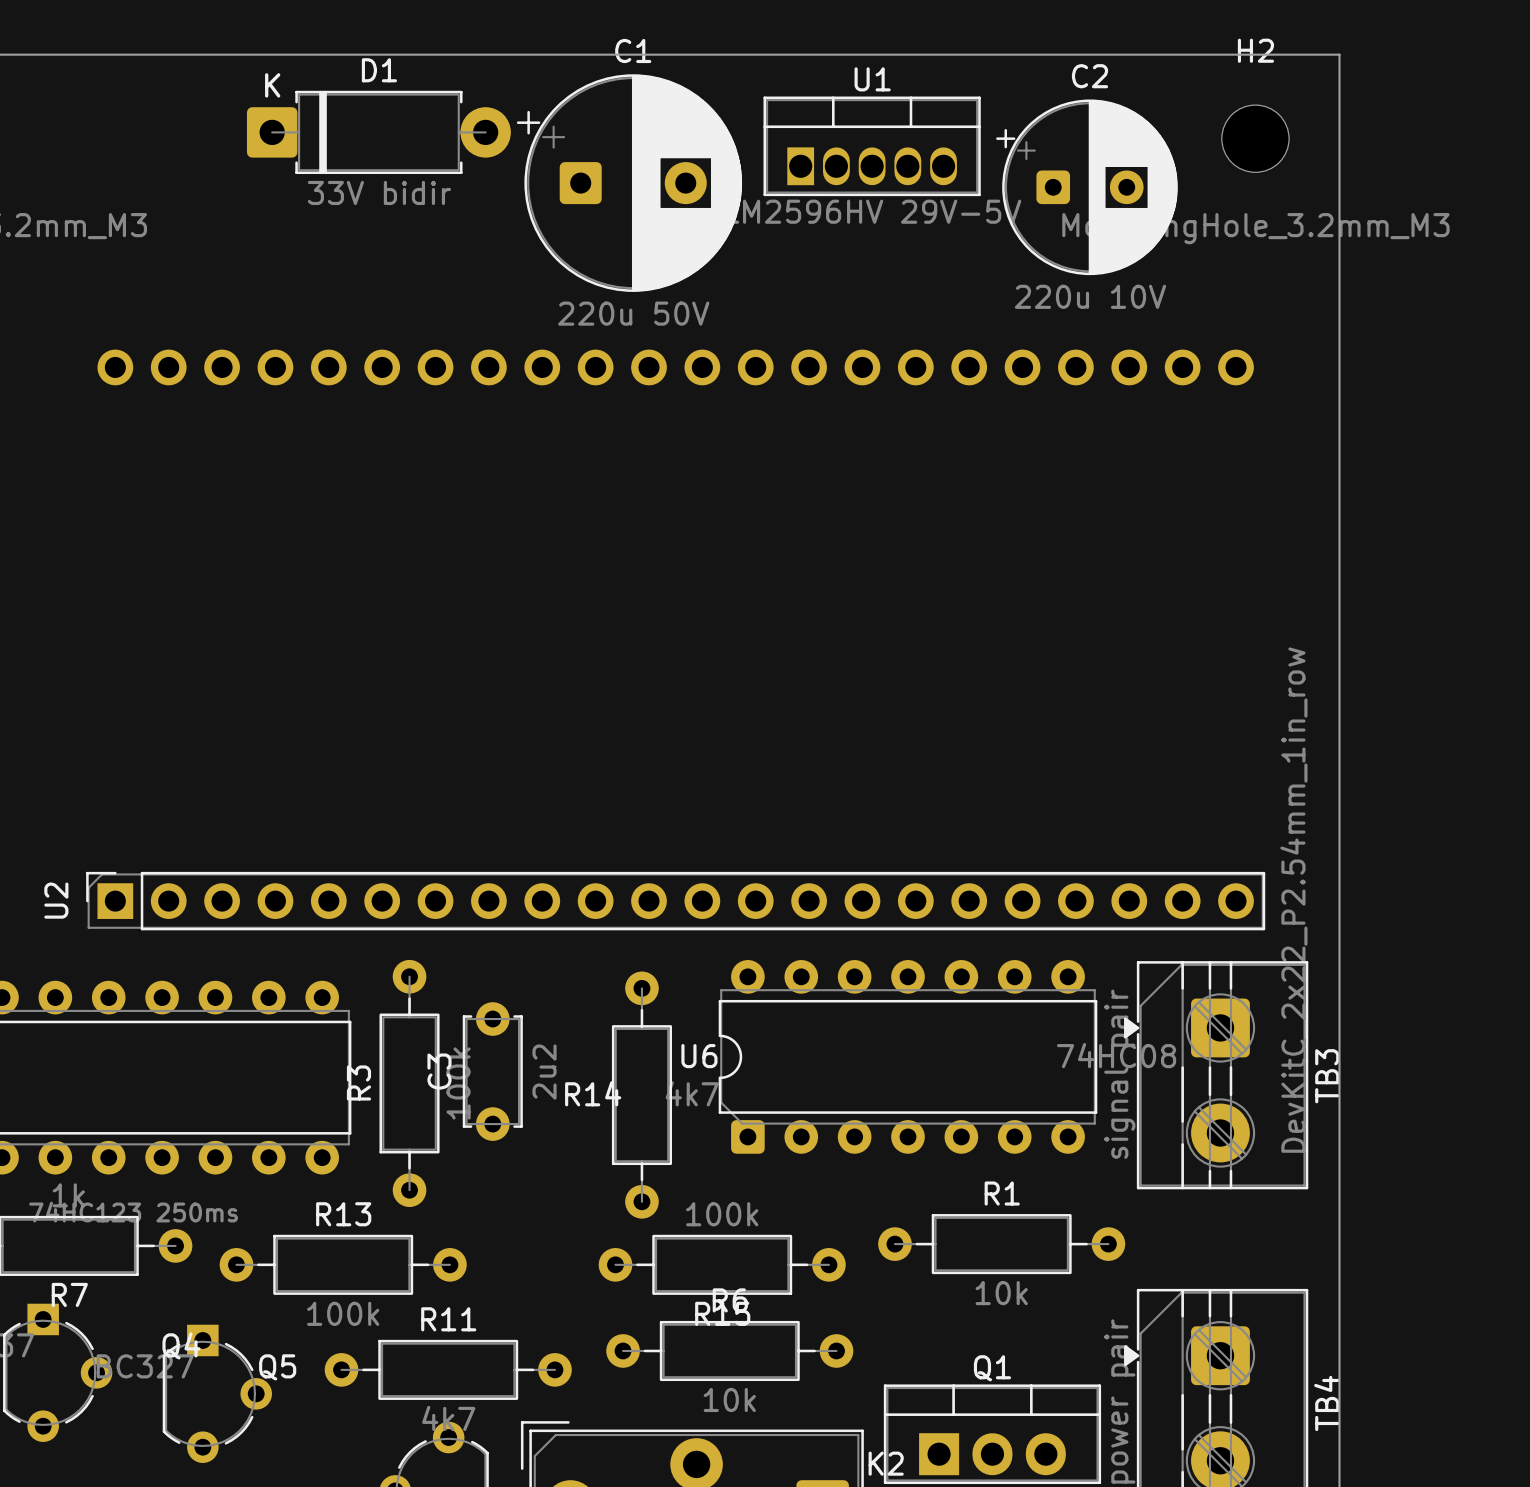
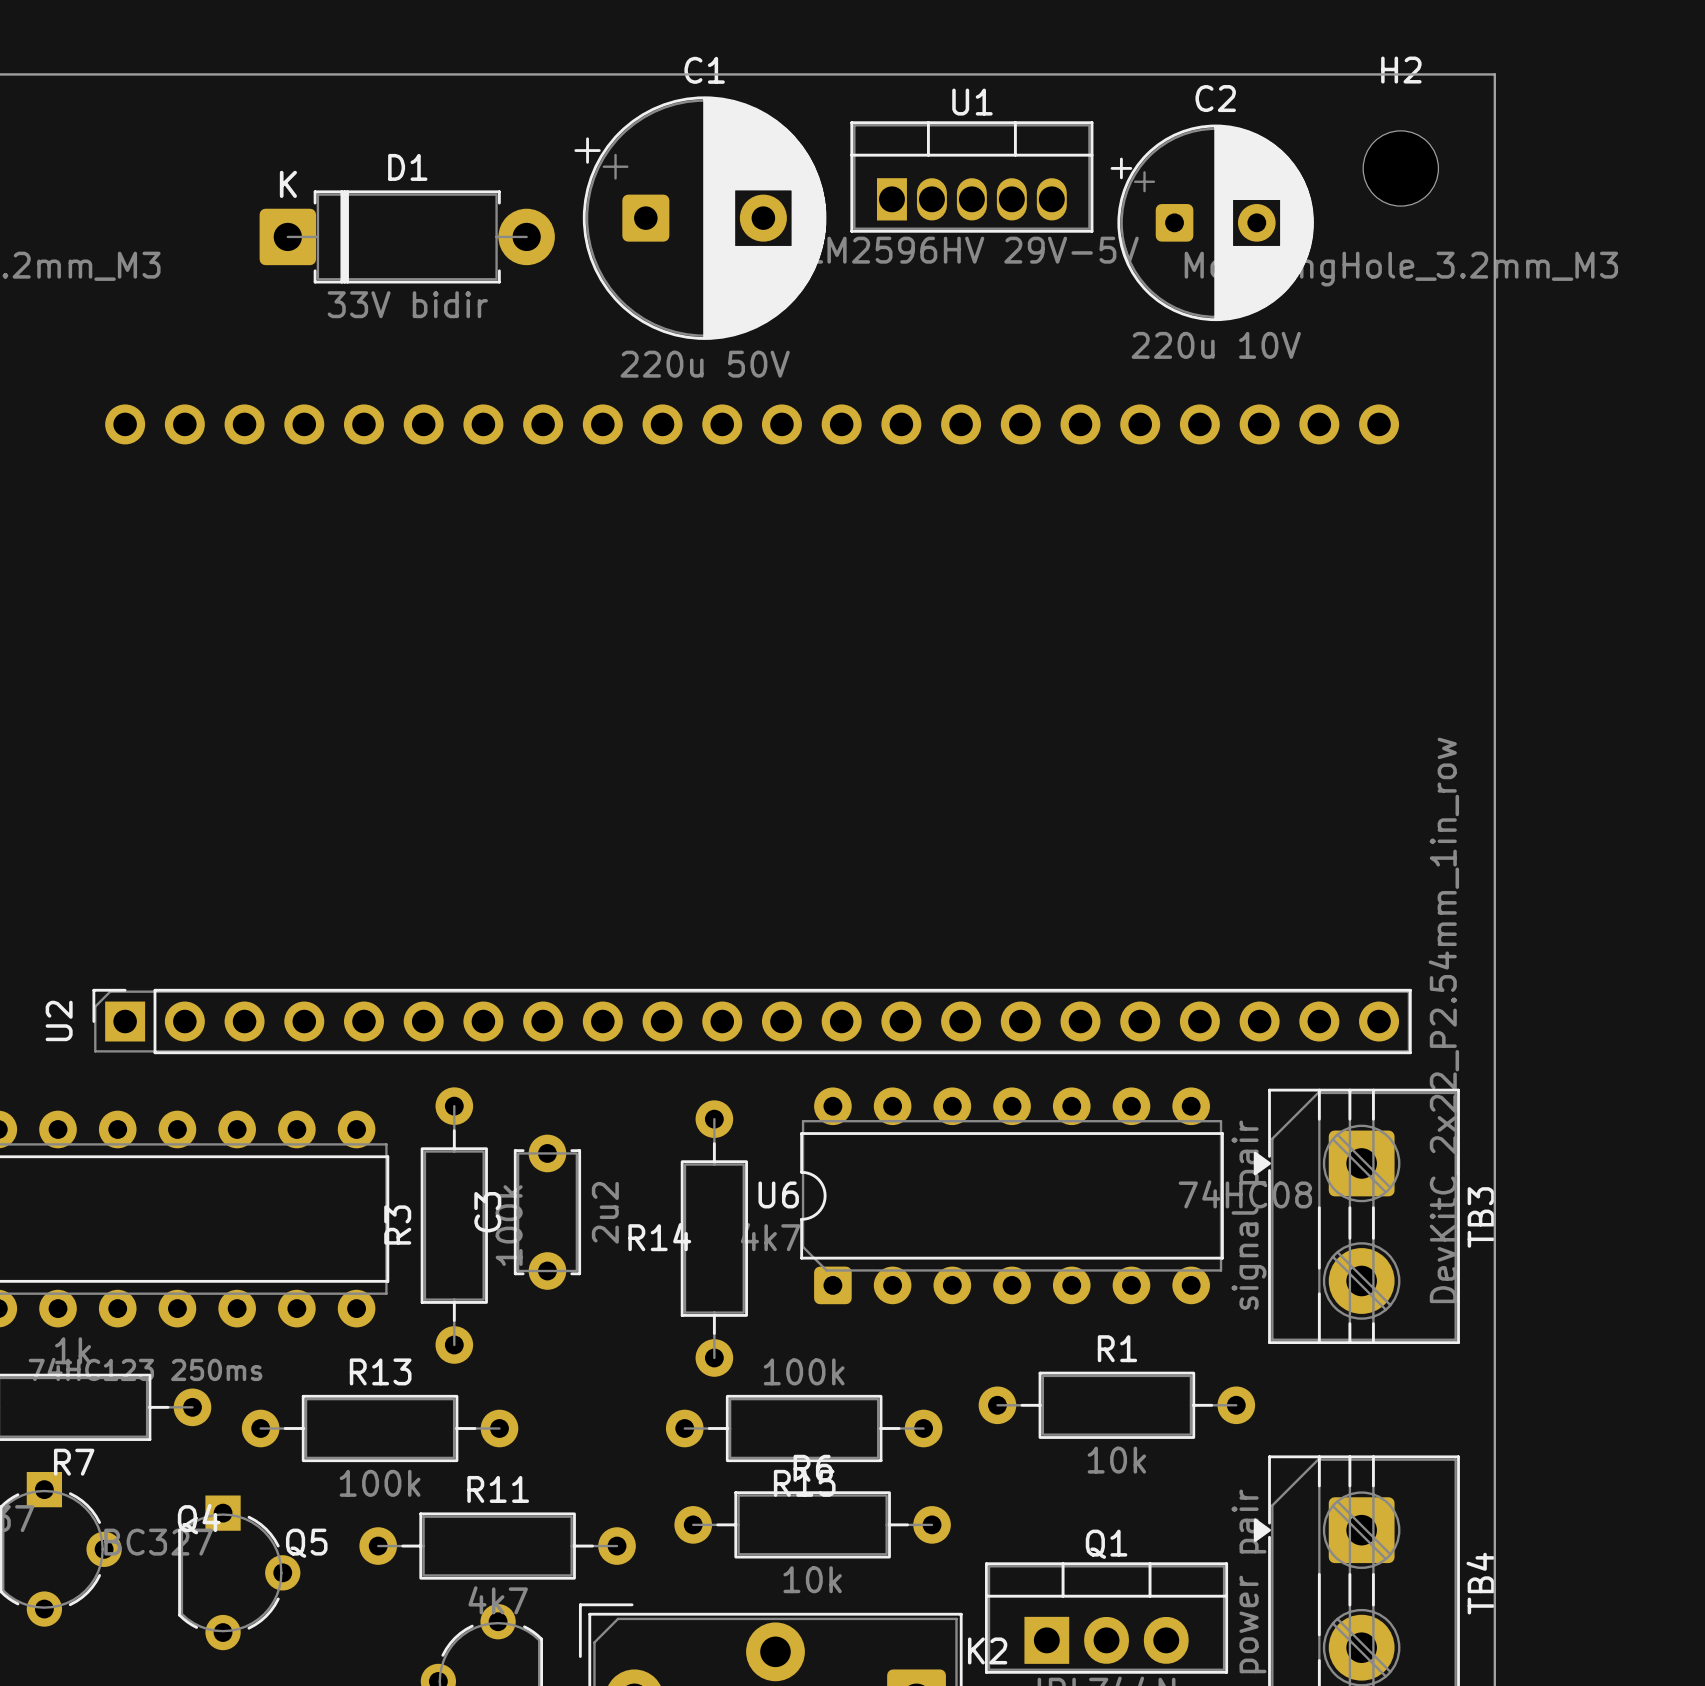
D1 position: (378, 132) -> (407, 236)

